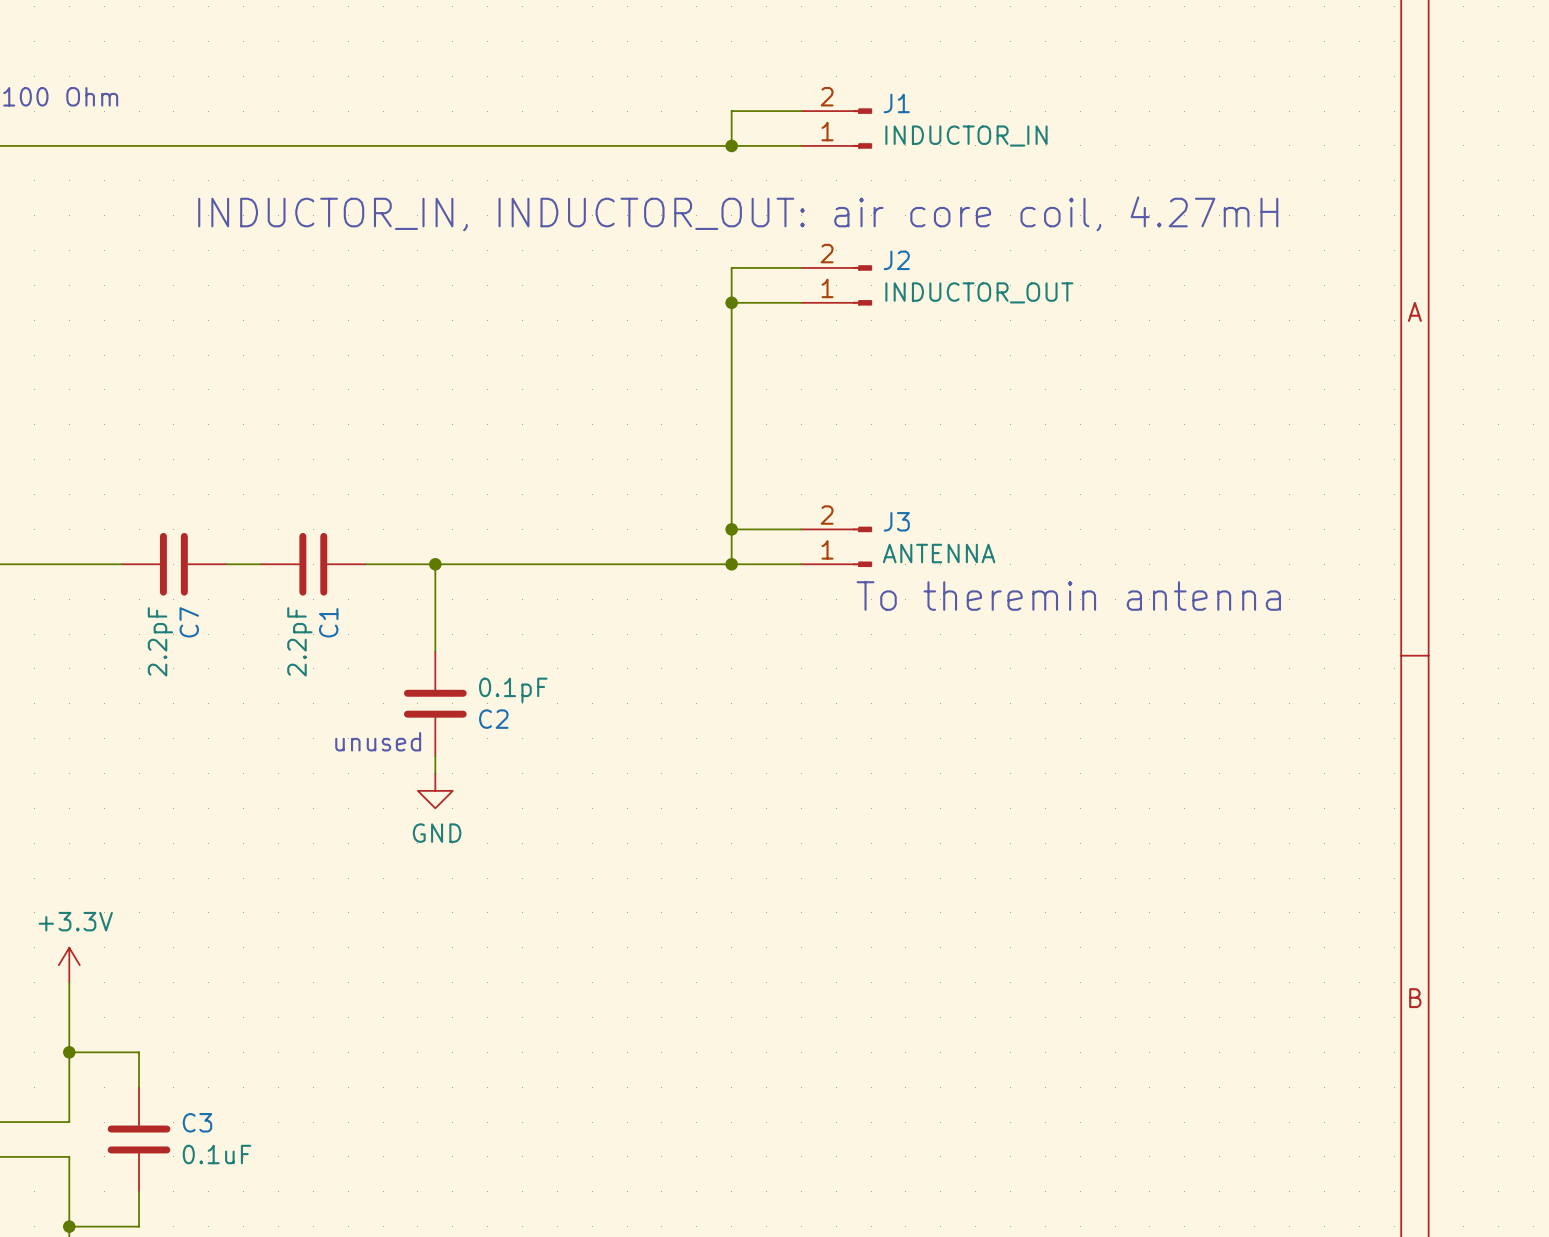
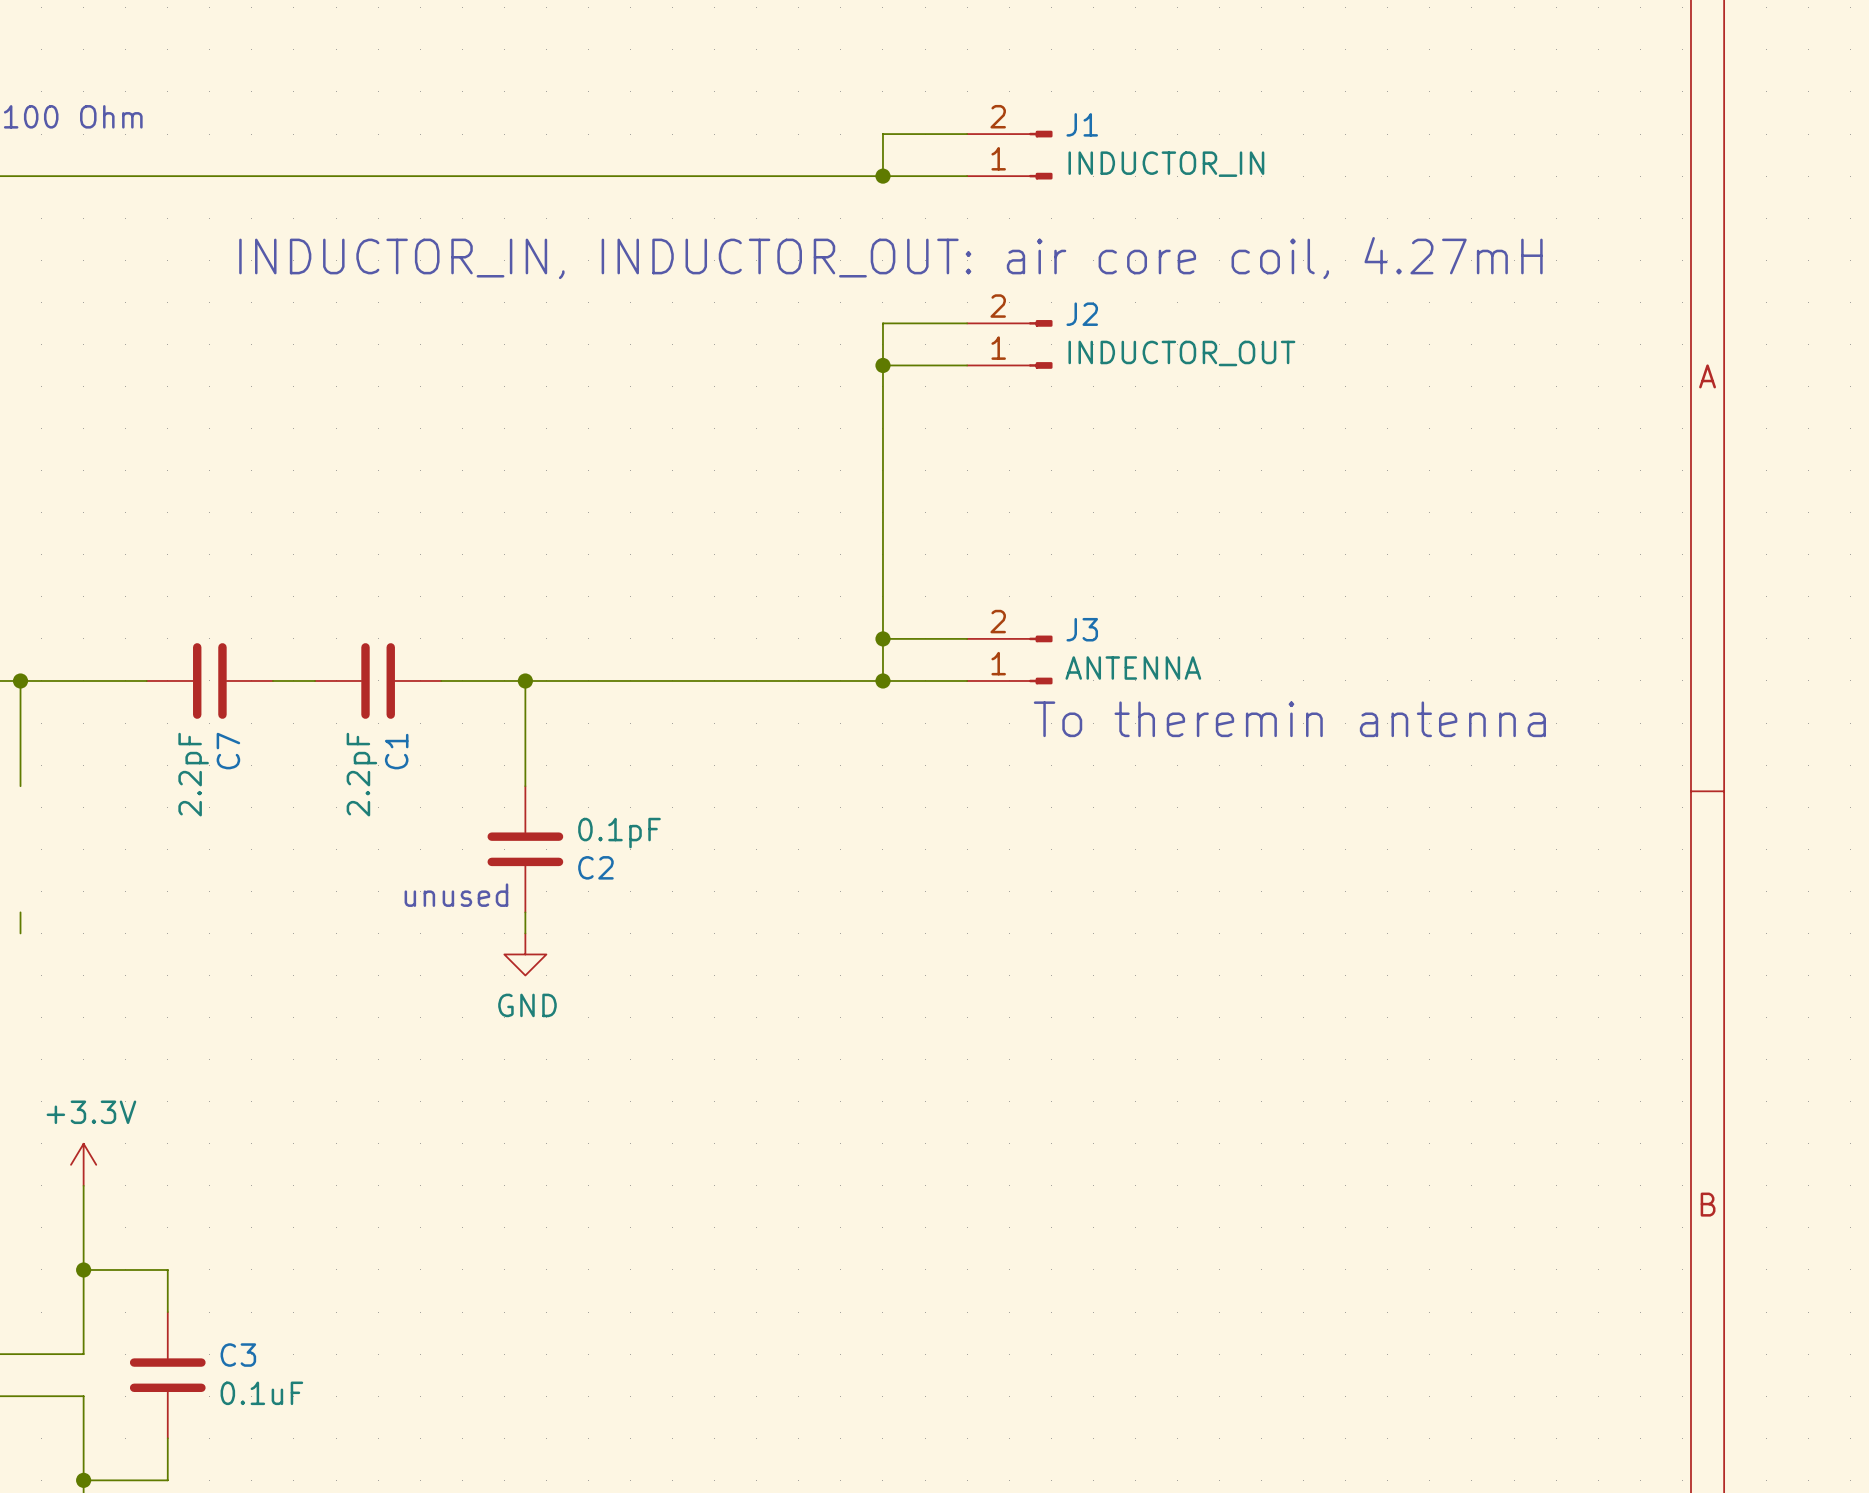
wire: none -> (20, 680) (20, 786)
junction: none -> (20, 680)
wire: none -> (20, 912) (20, 933)

